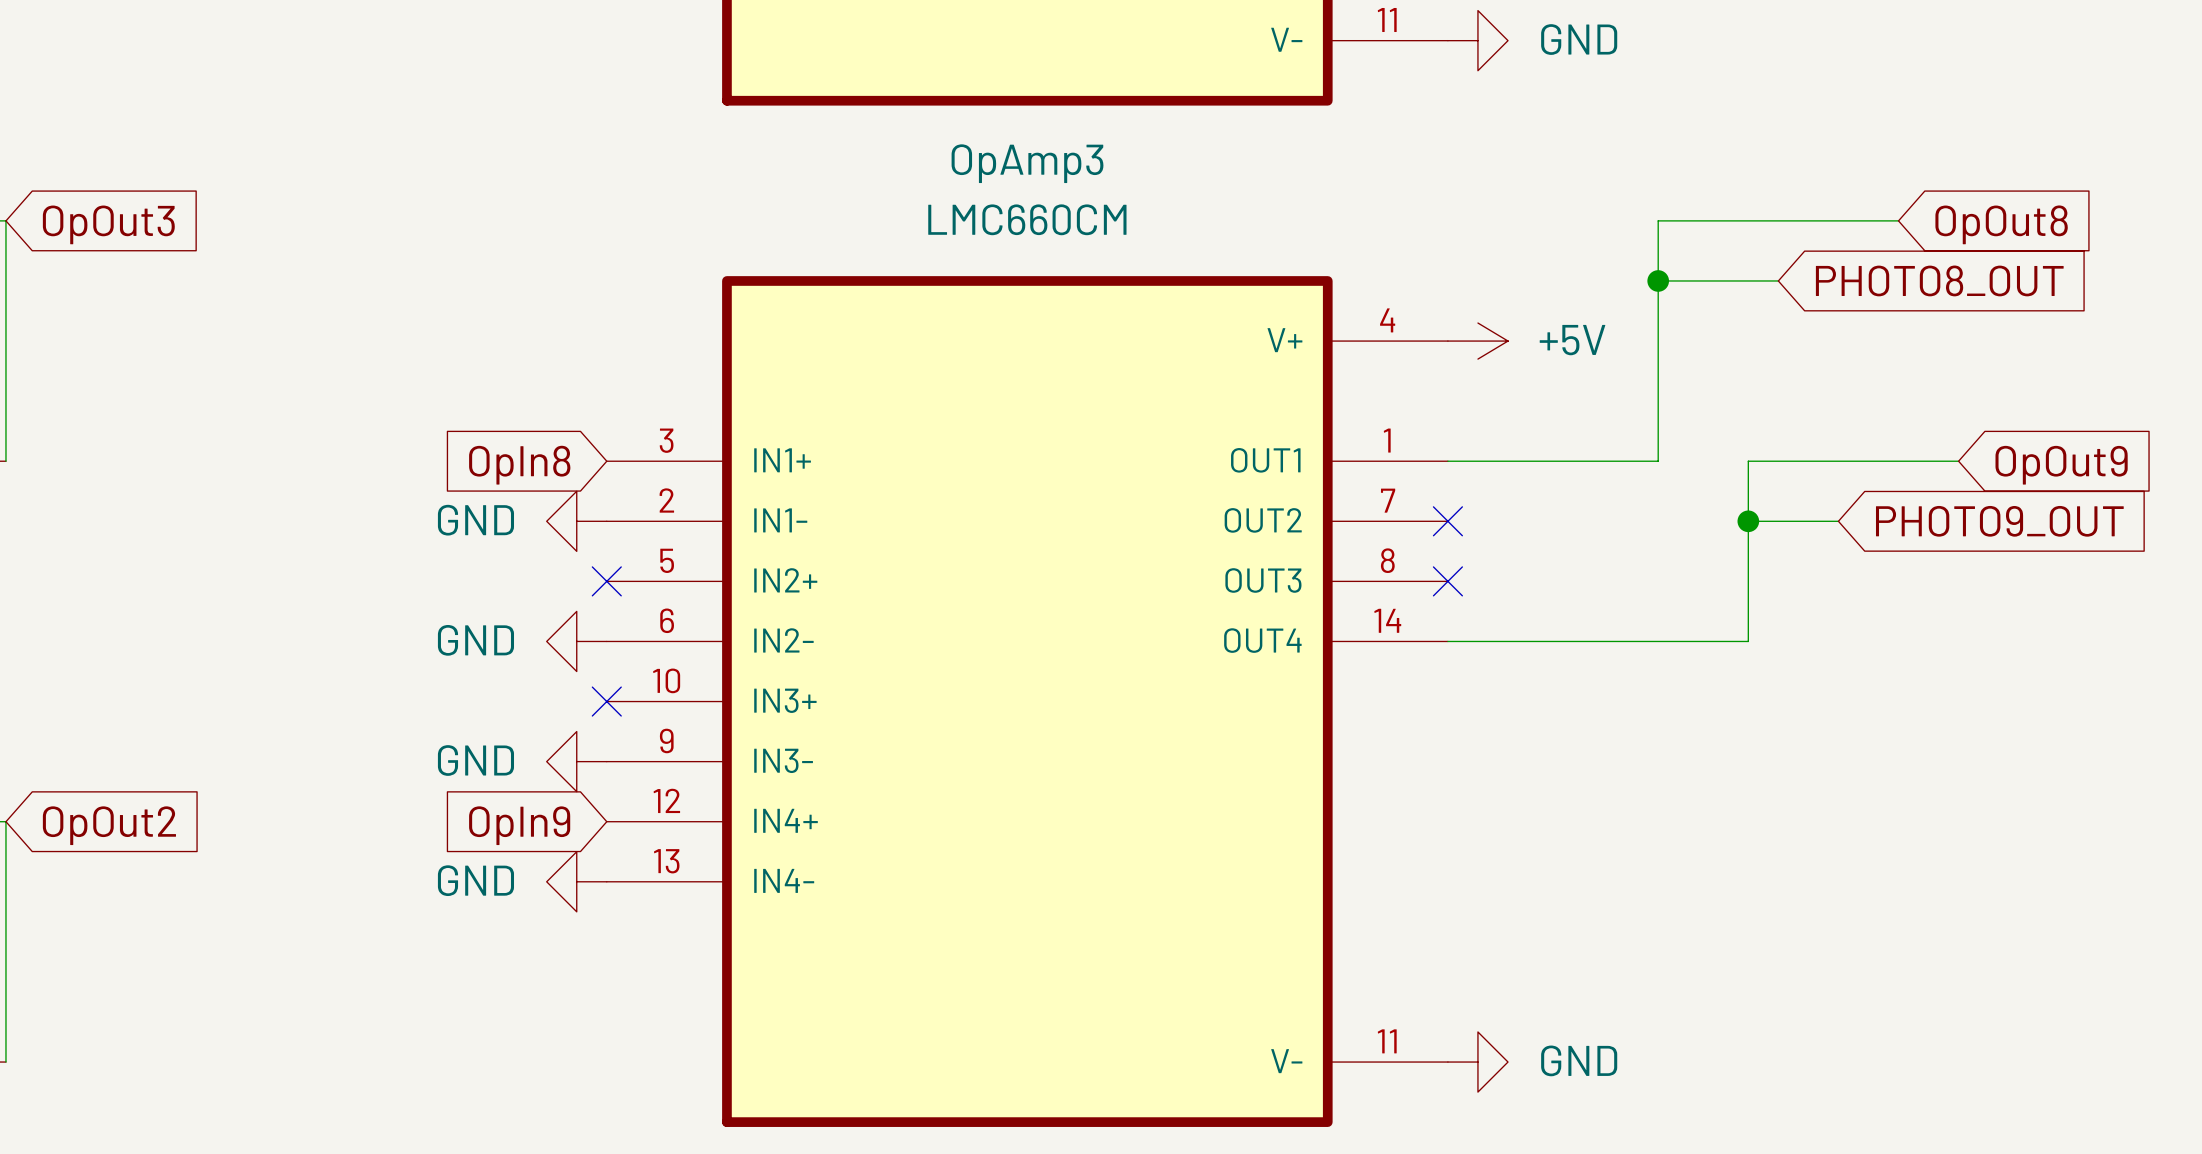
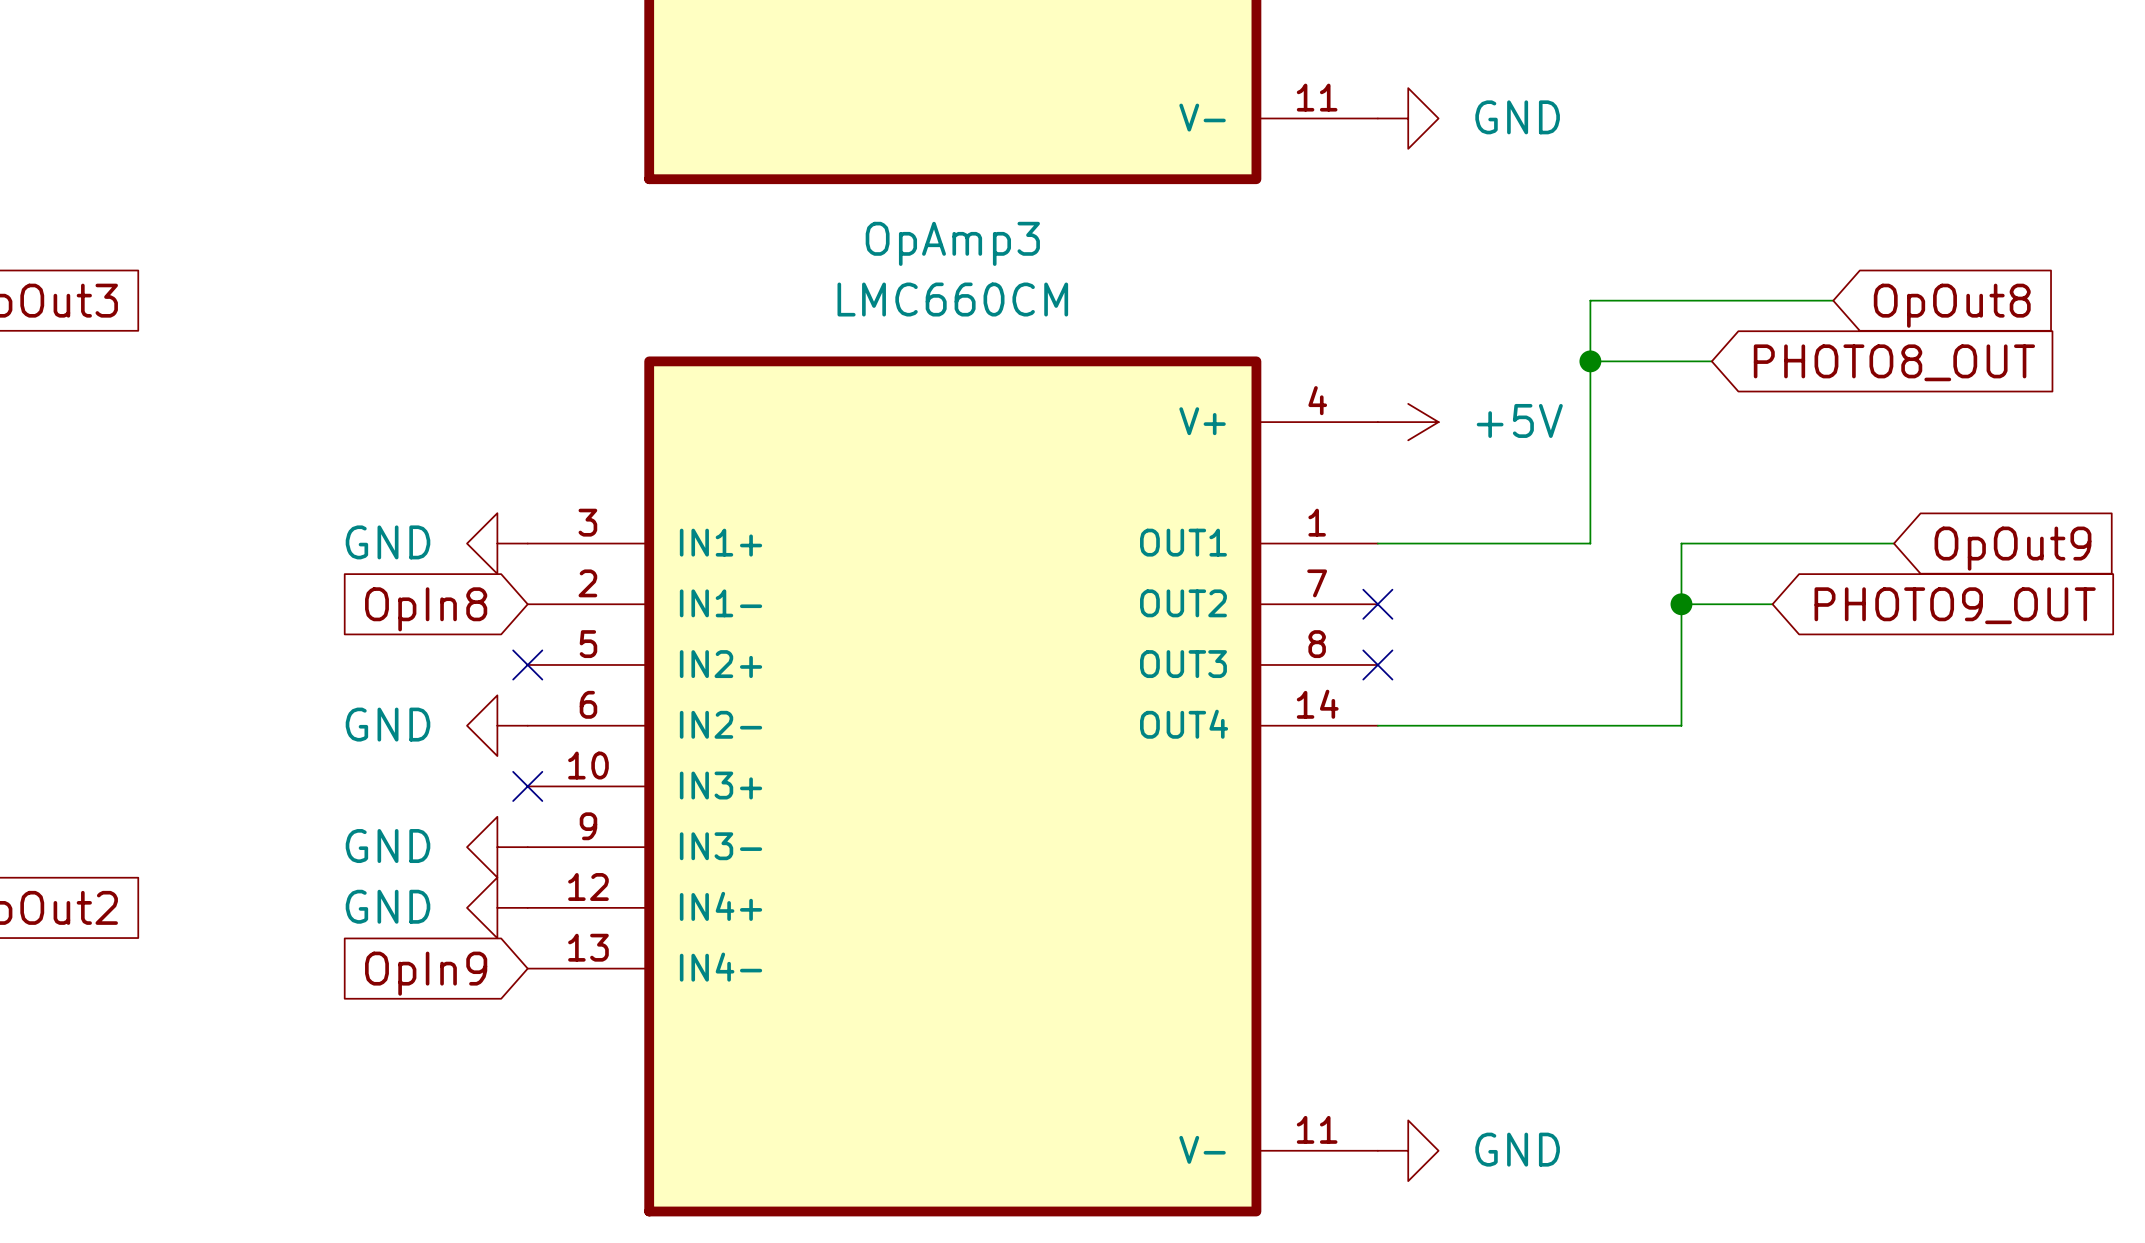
global label position: OpIn8 (519, 465) -> OpIn8 (426, 609)
power symbol position: GND (576, 521) -> GND (497, 543)
global label position: OpIn9 (519, 825) -> OpIn9 (426, 973)
power symbol position: GND (576, 881) -> GND (497, 907)

